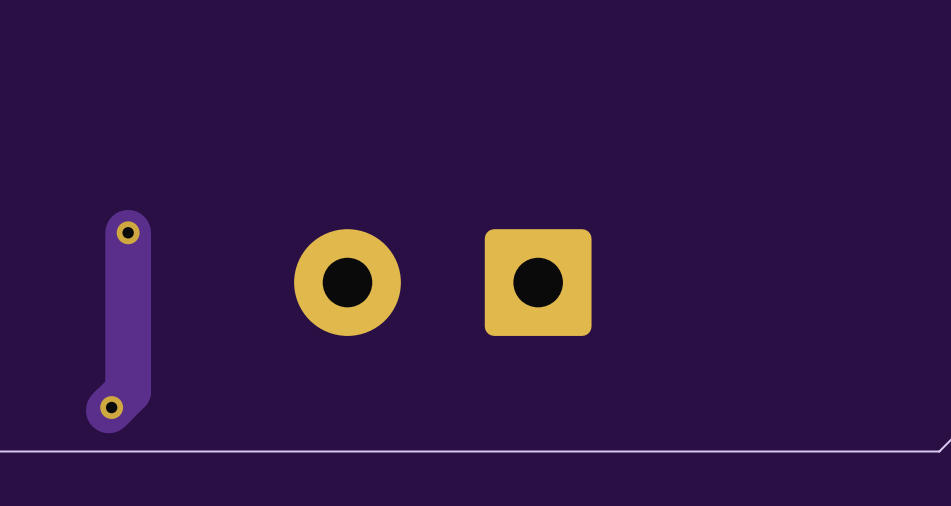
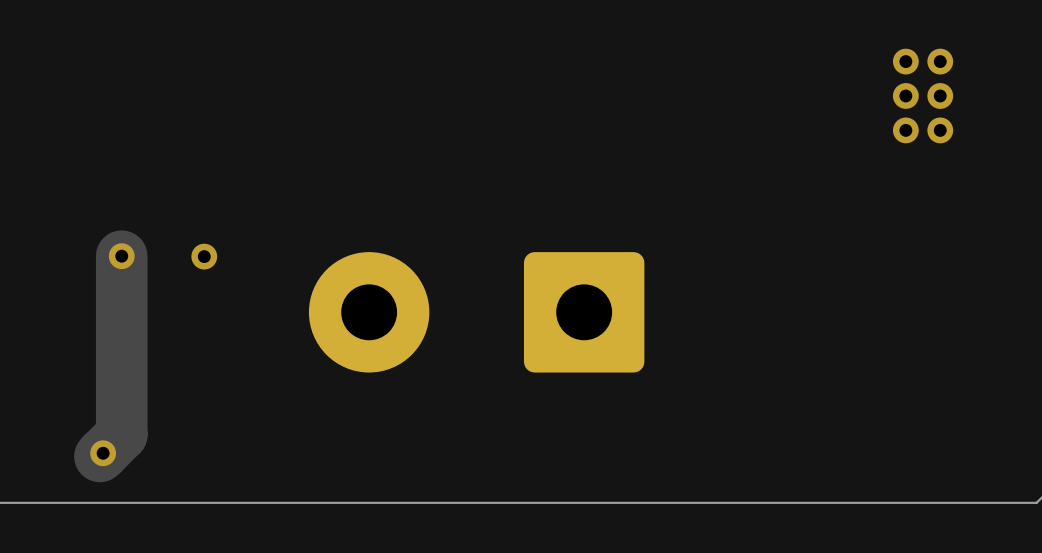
via: none -> (905, 61)
via: none -> (940, 61)
via: none -> (905, 95)
via: none -> (940, 95)
via: none -> (905, 130)
via: none -> (940, 130)
via: none -> (204, 256)

